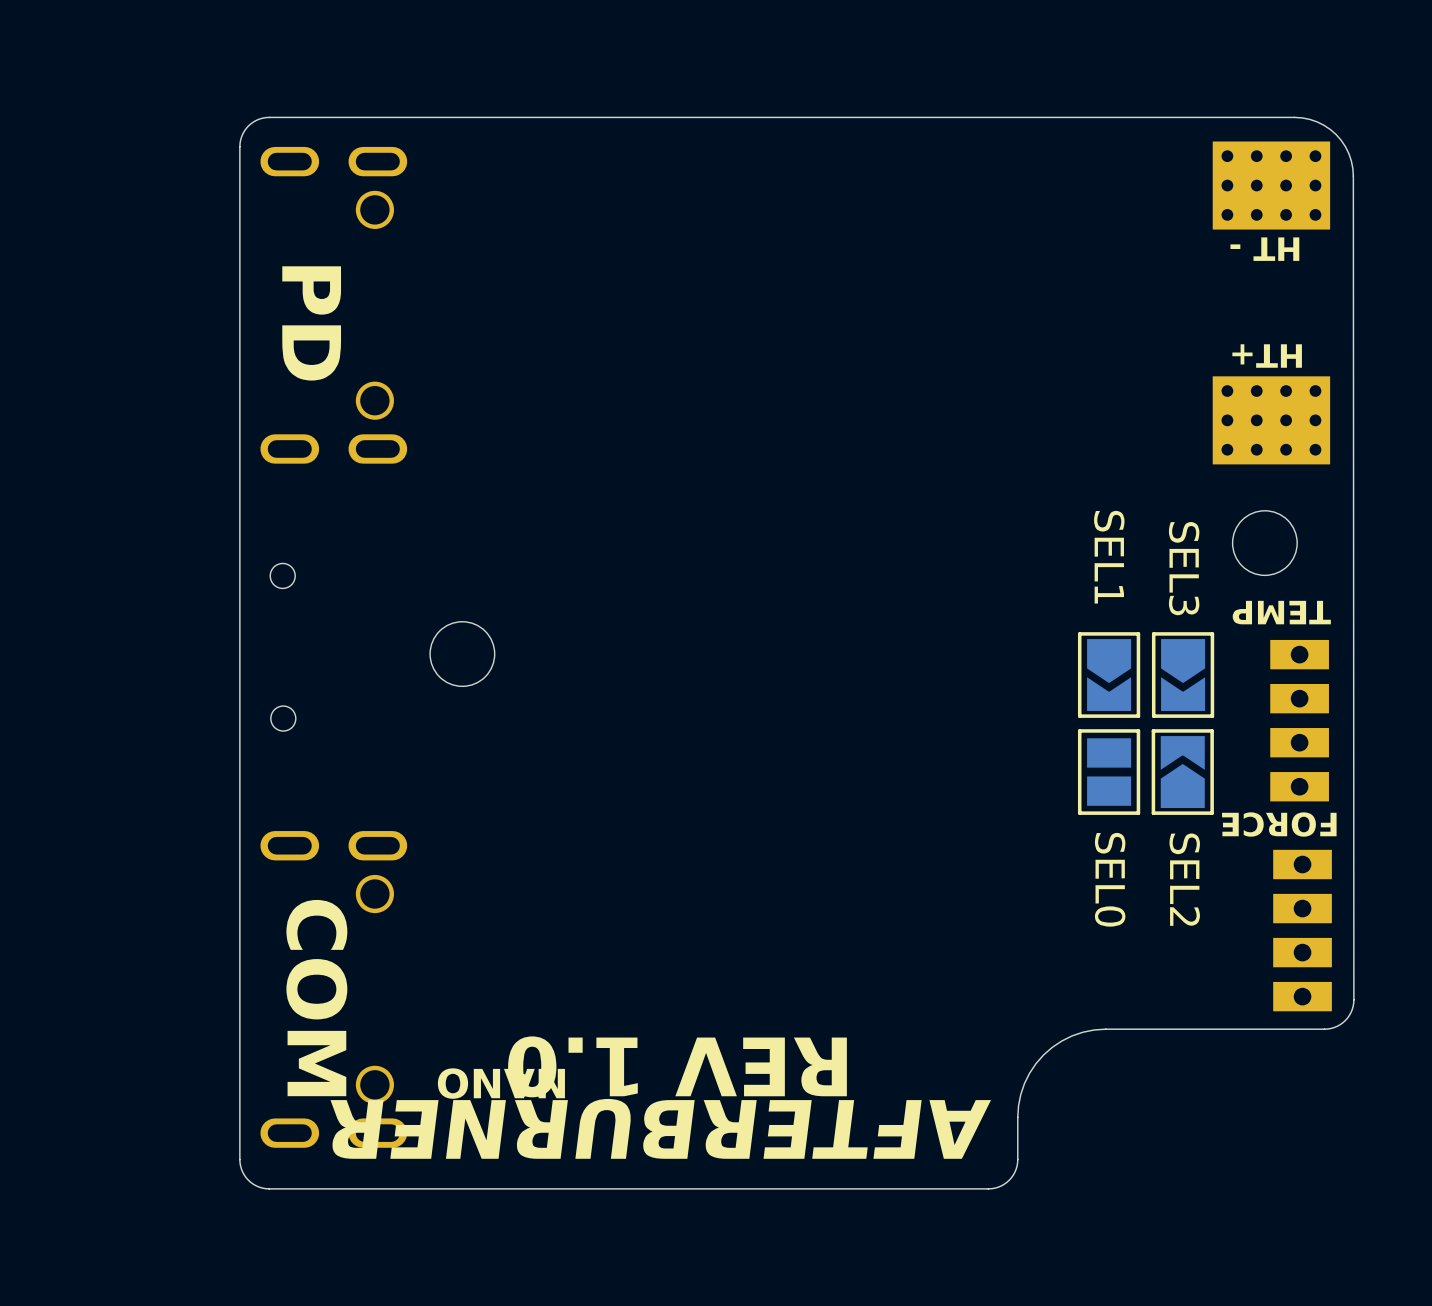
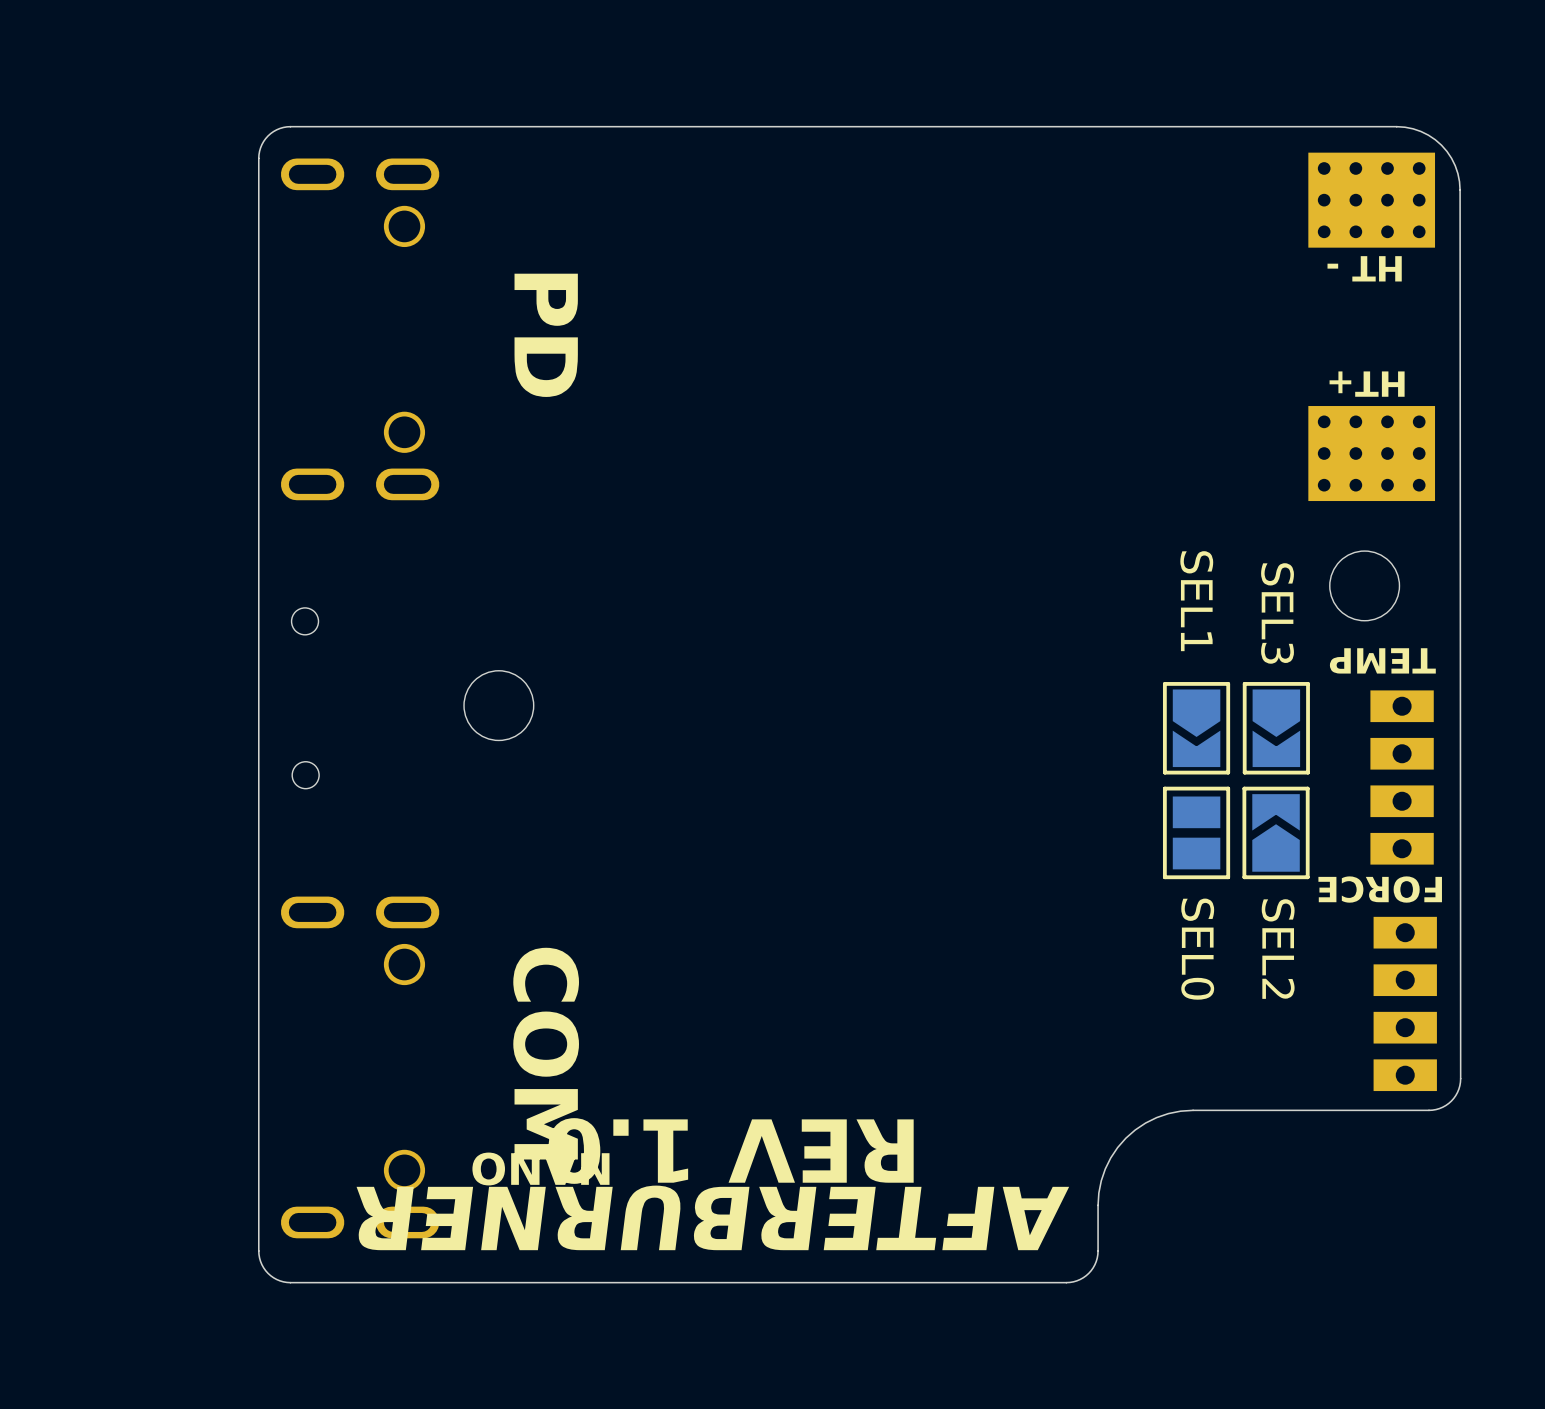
text position: PD (311, 323) -> PD (546, 335)
text position: COM (316, 998) -> COM (546, 1053)

